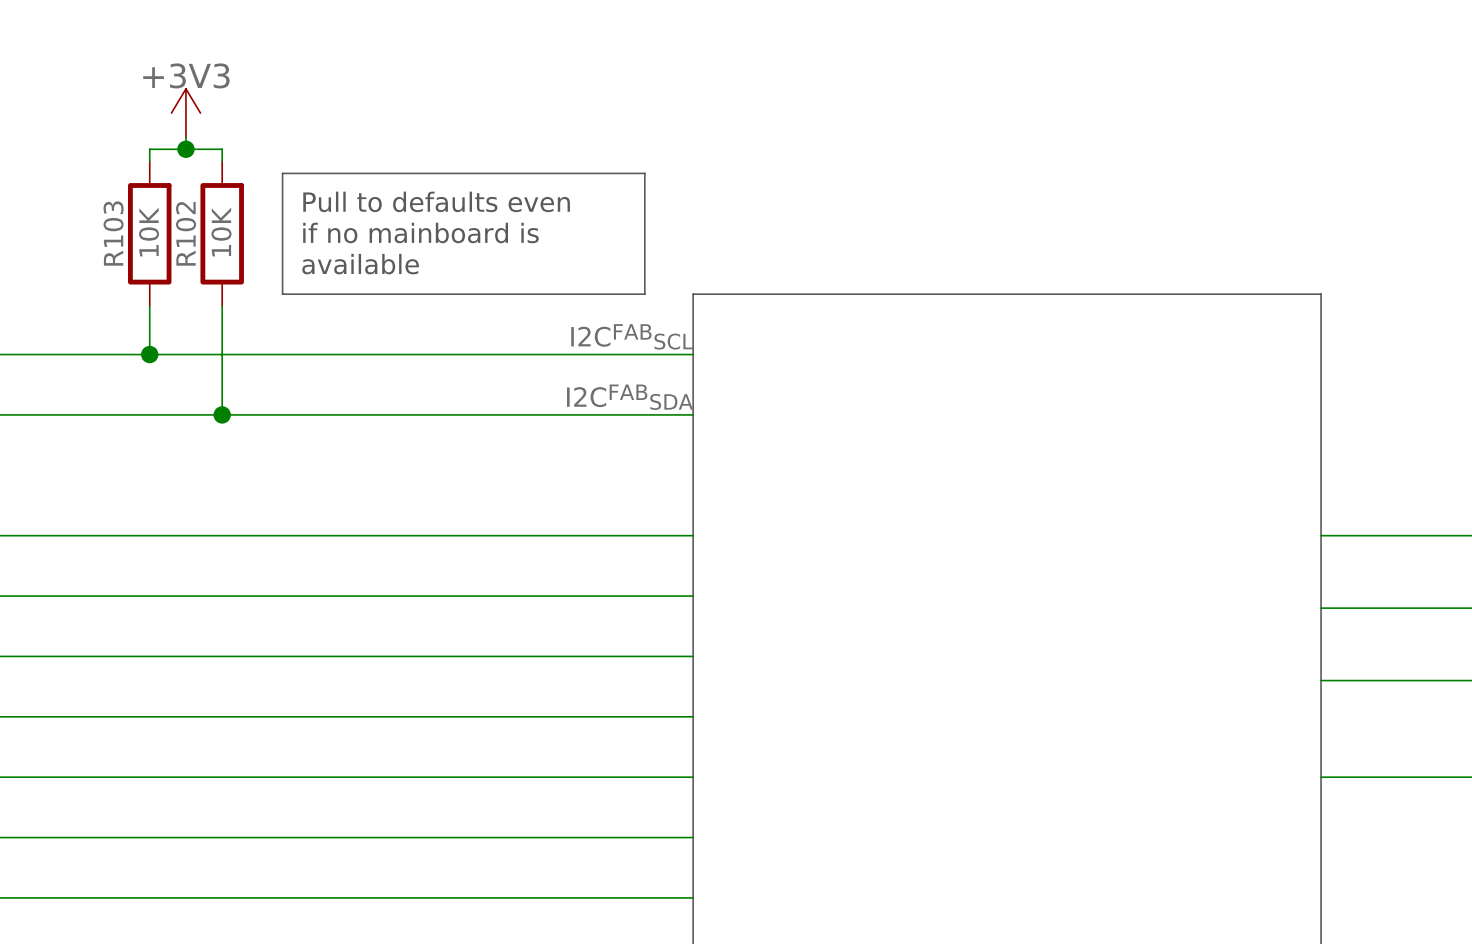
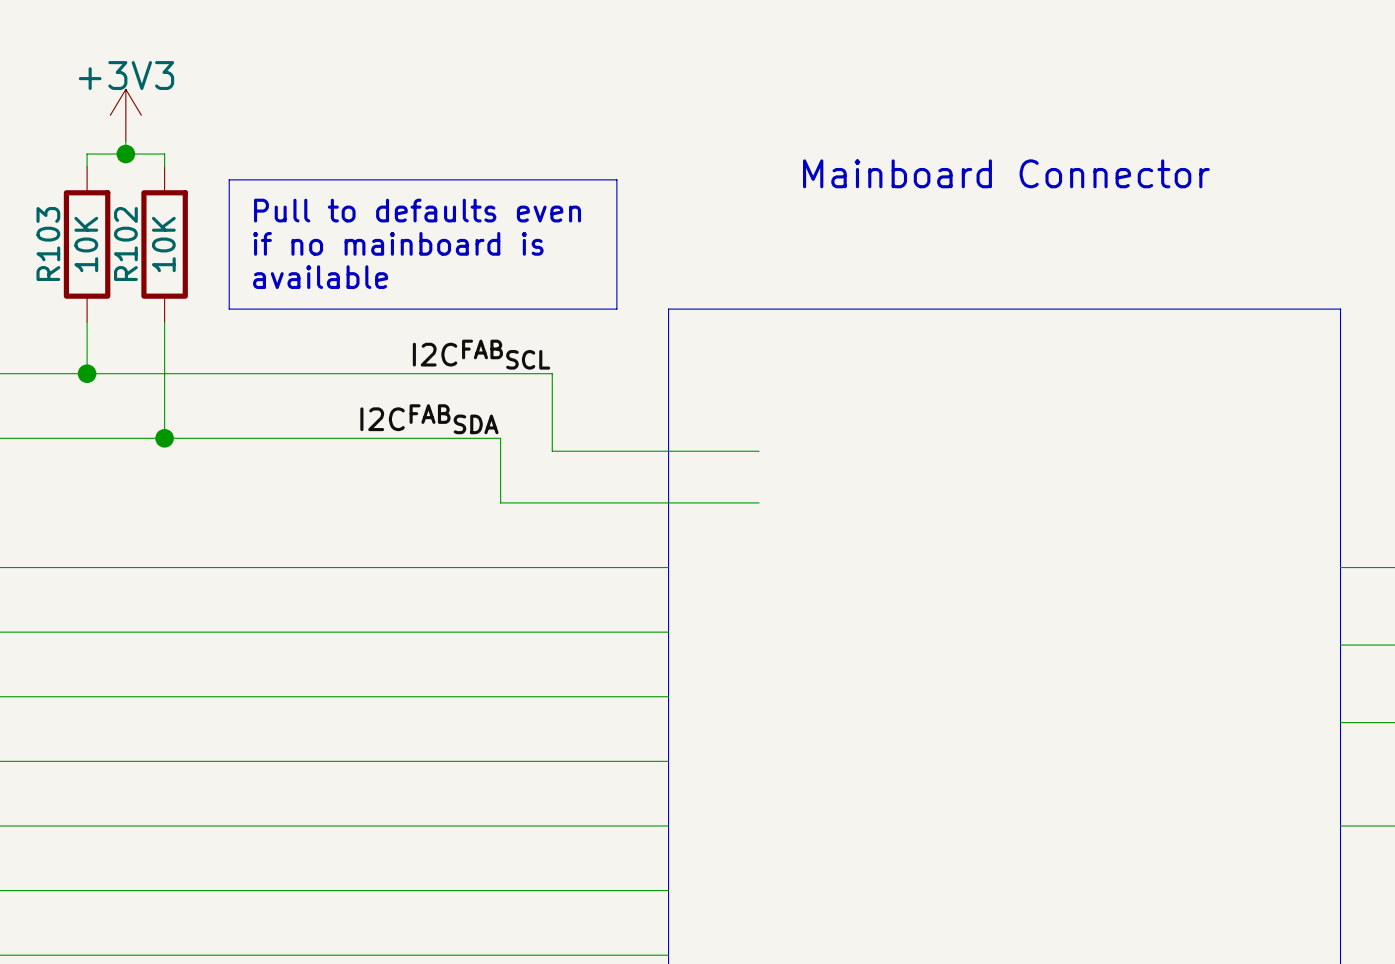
text: none -> Mainboard Connector (1006, 173)
label position: I2CFABSCL (632, 336) -> I2CFABSCL (481, 354)
wire: (584, 354) (693, 354) -> (552, 373) (552, 451) (759, 451)
label position: I2CFABSDA (629, 397) -> I2CFABSDA (429, 419)
wire: (536, 414) (693, 414) -> (500, 438) (500, 502) (759, 502)

